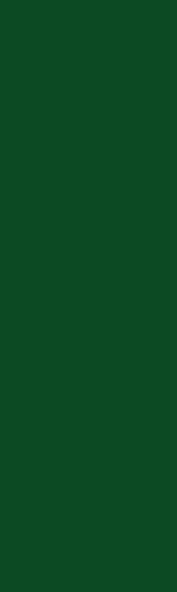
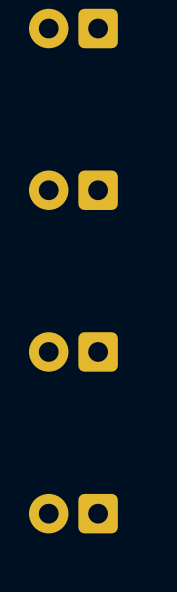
part: none -> (73, 28)
part: none -> (73, 190)
part: none -> (73, 351)
part: none -> (73, 513)

